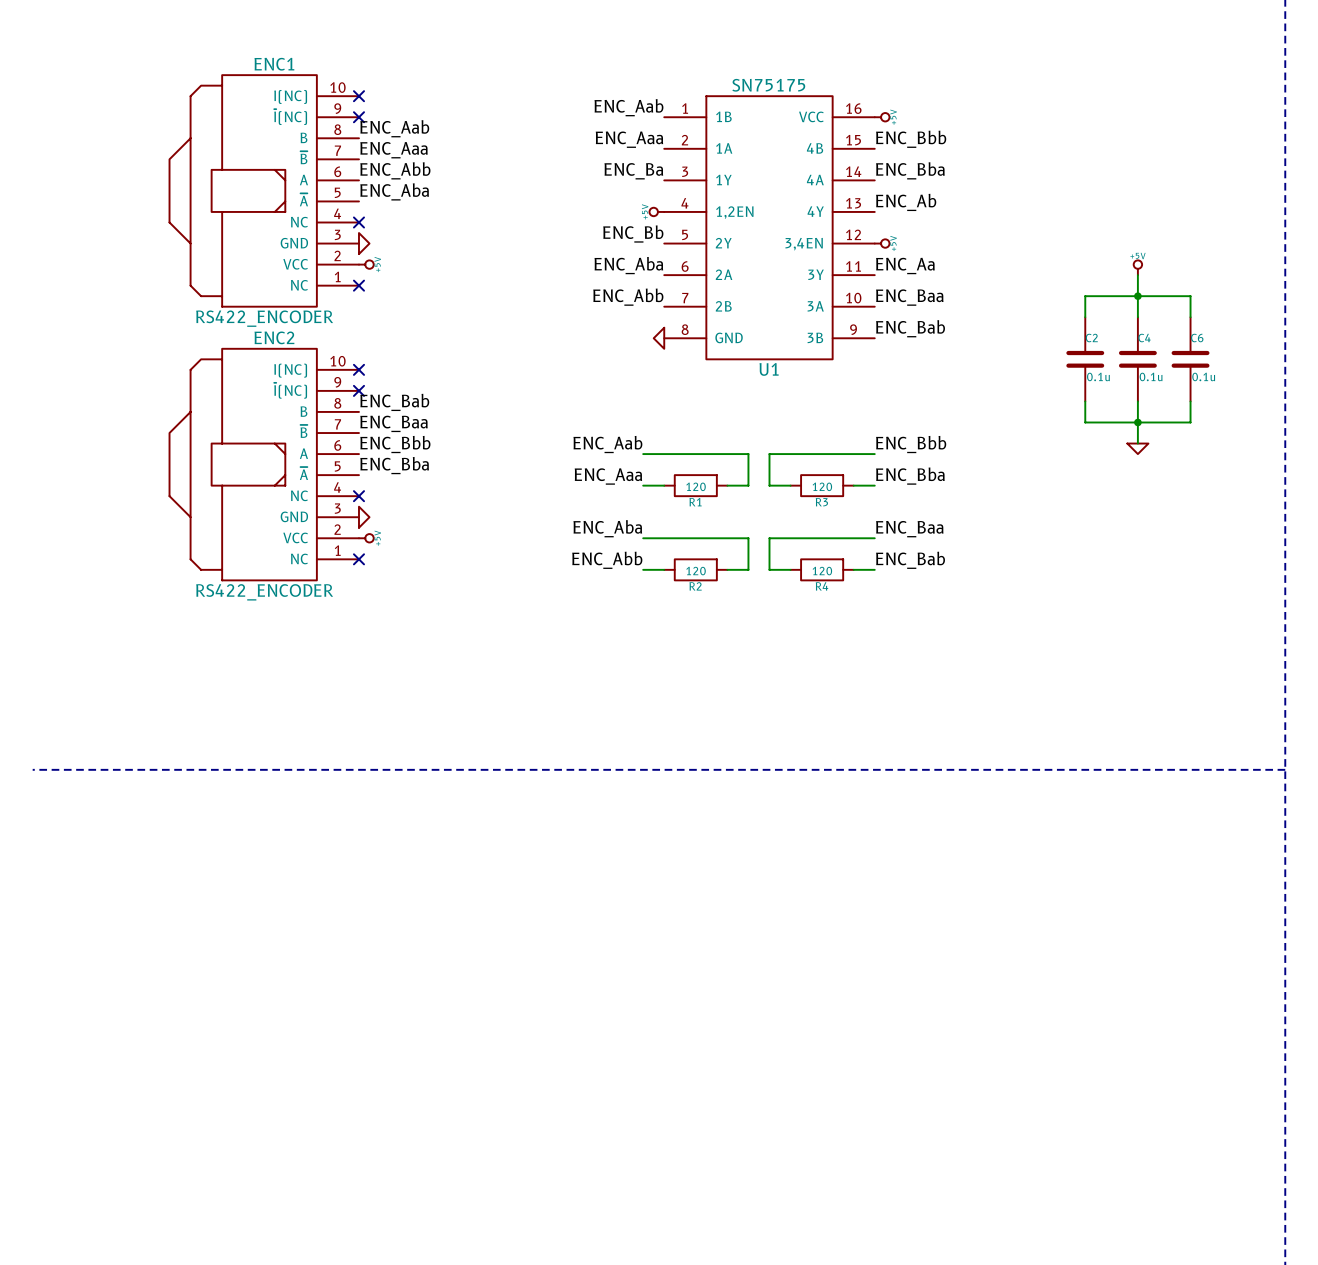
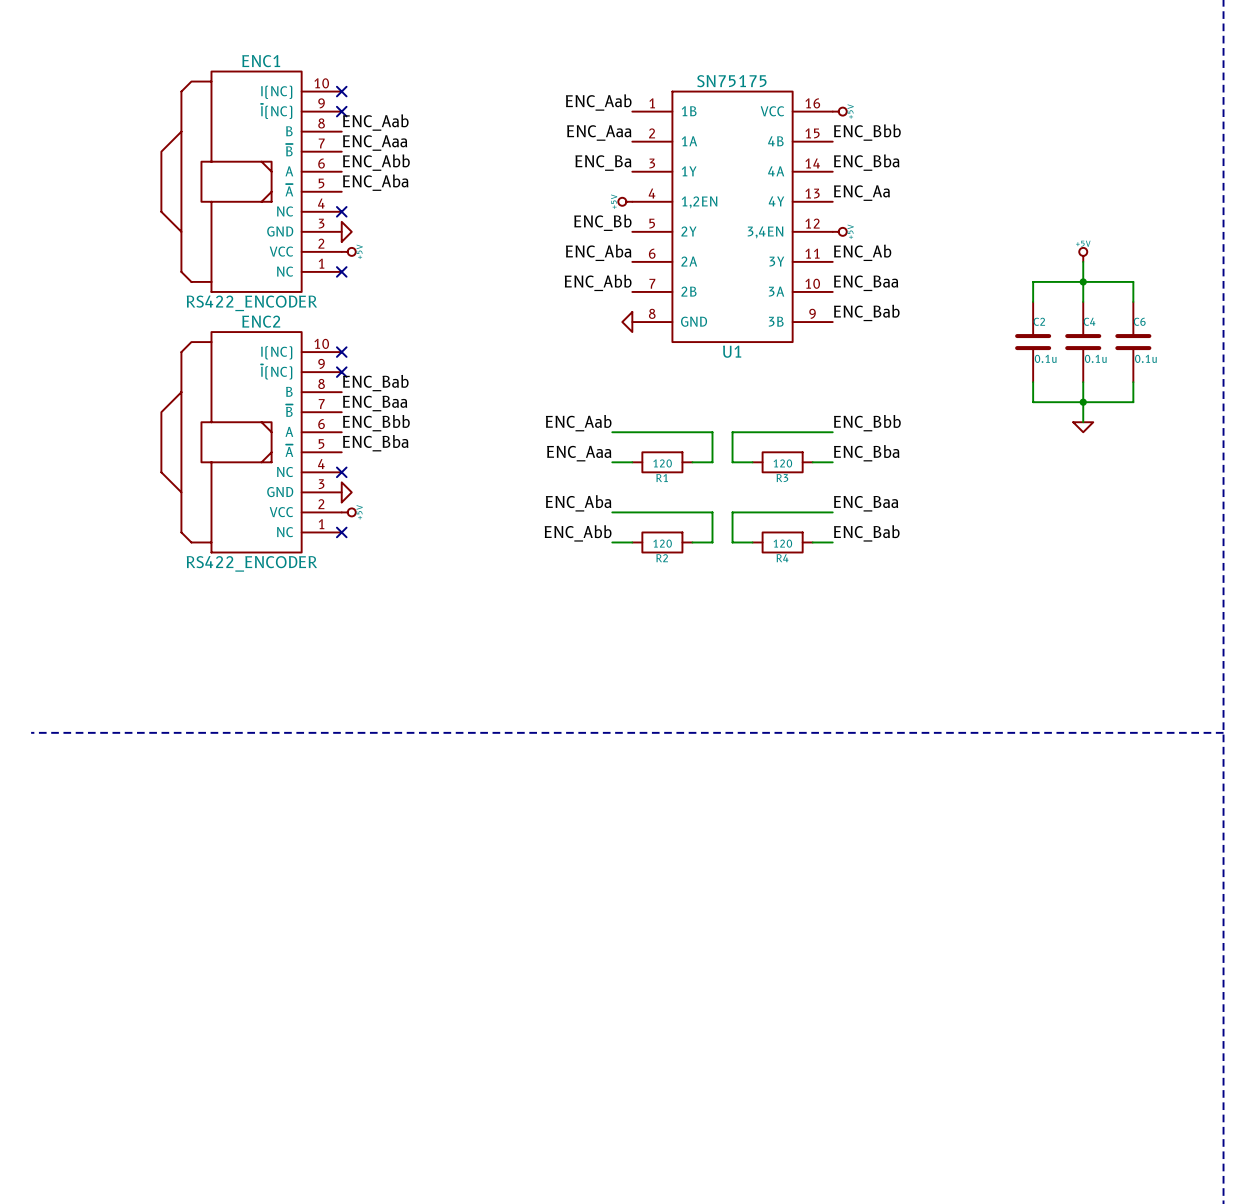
label: ENC_Ab (906, 202) -> ENC_Aa (861, 193)
label: ENC_Aa (905, 265) -> ENC_Ab (862, 252)

